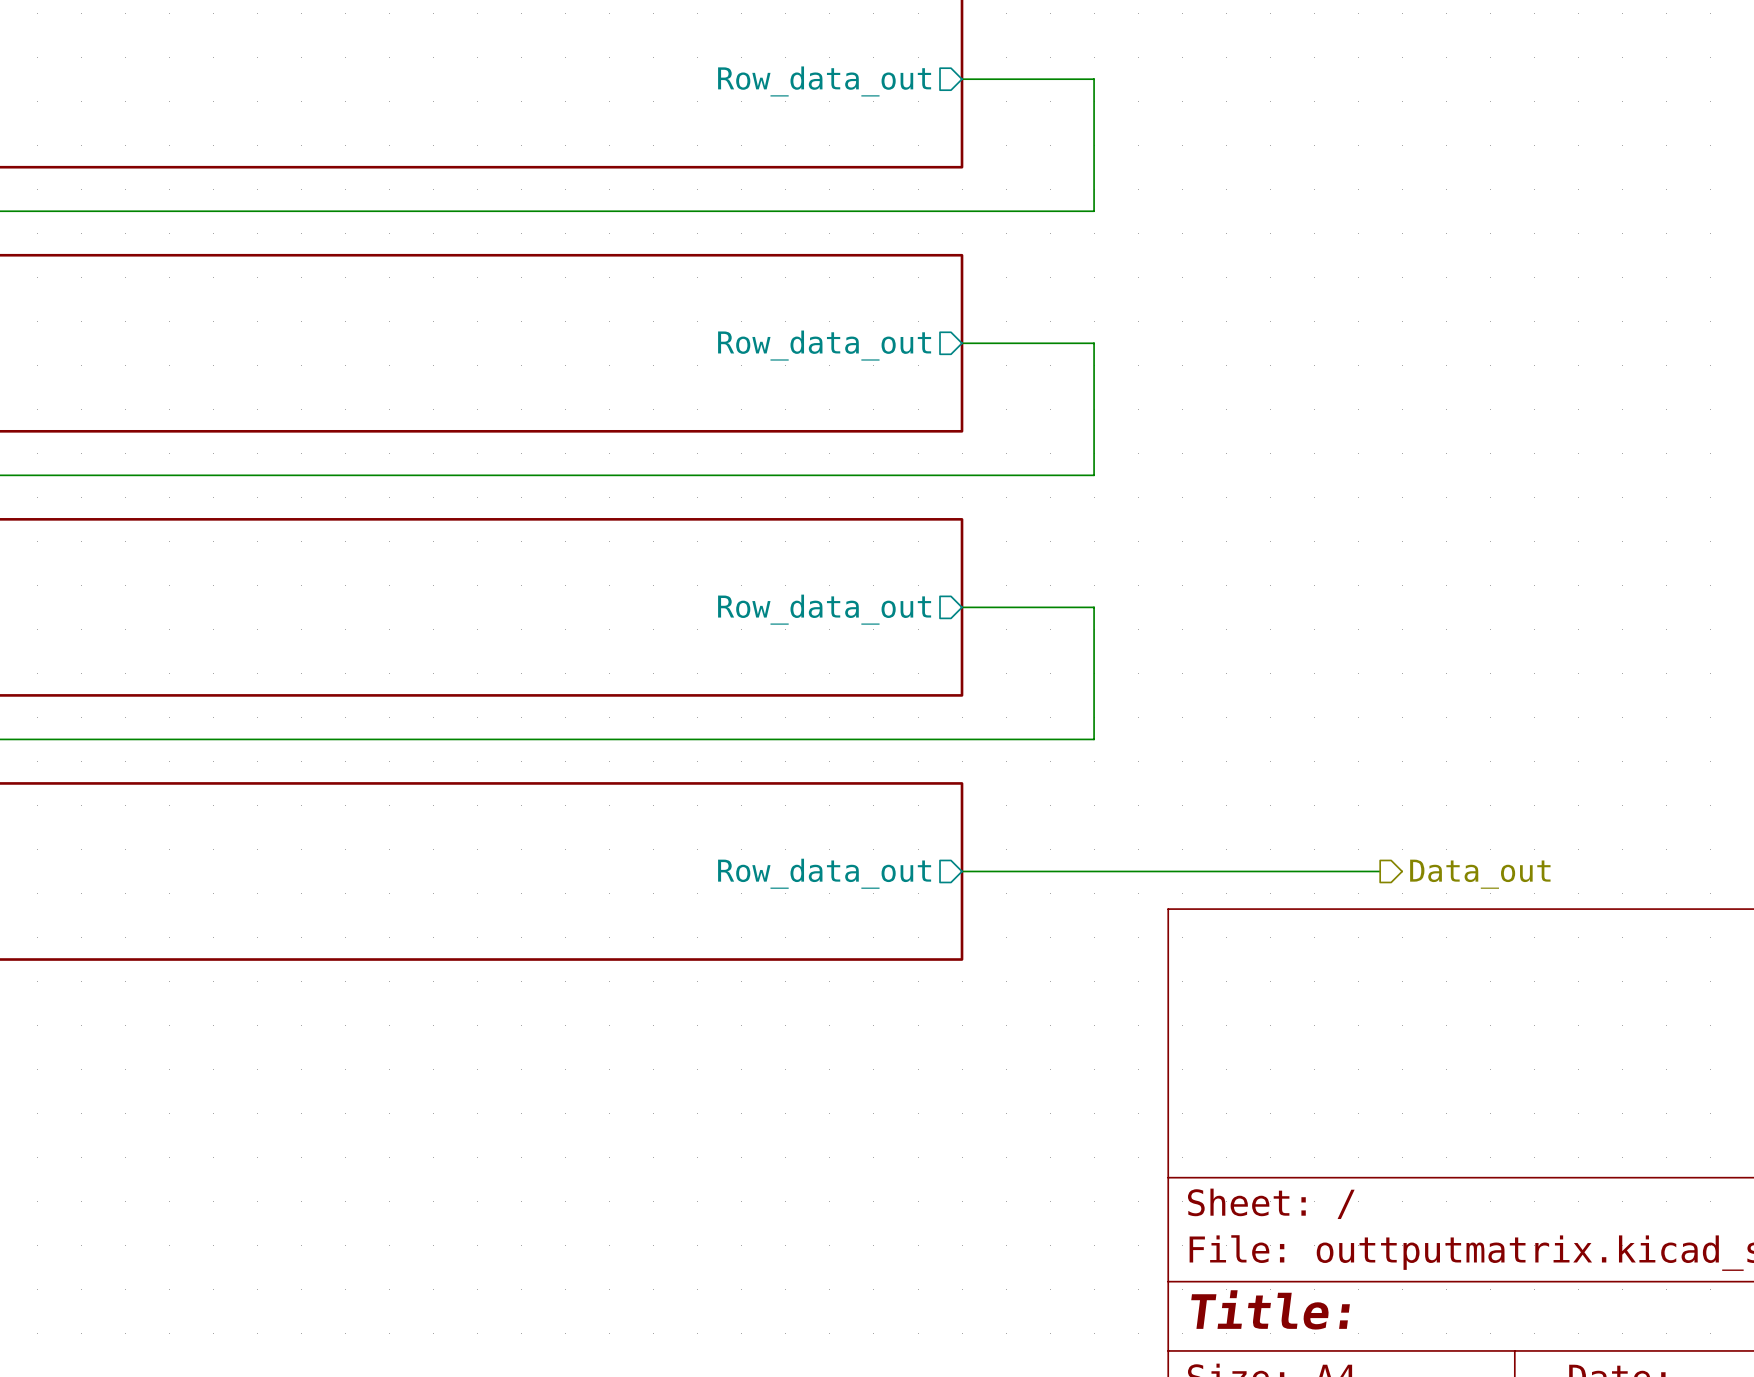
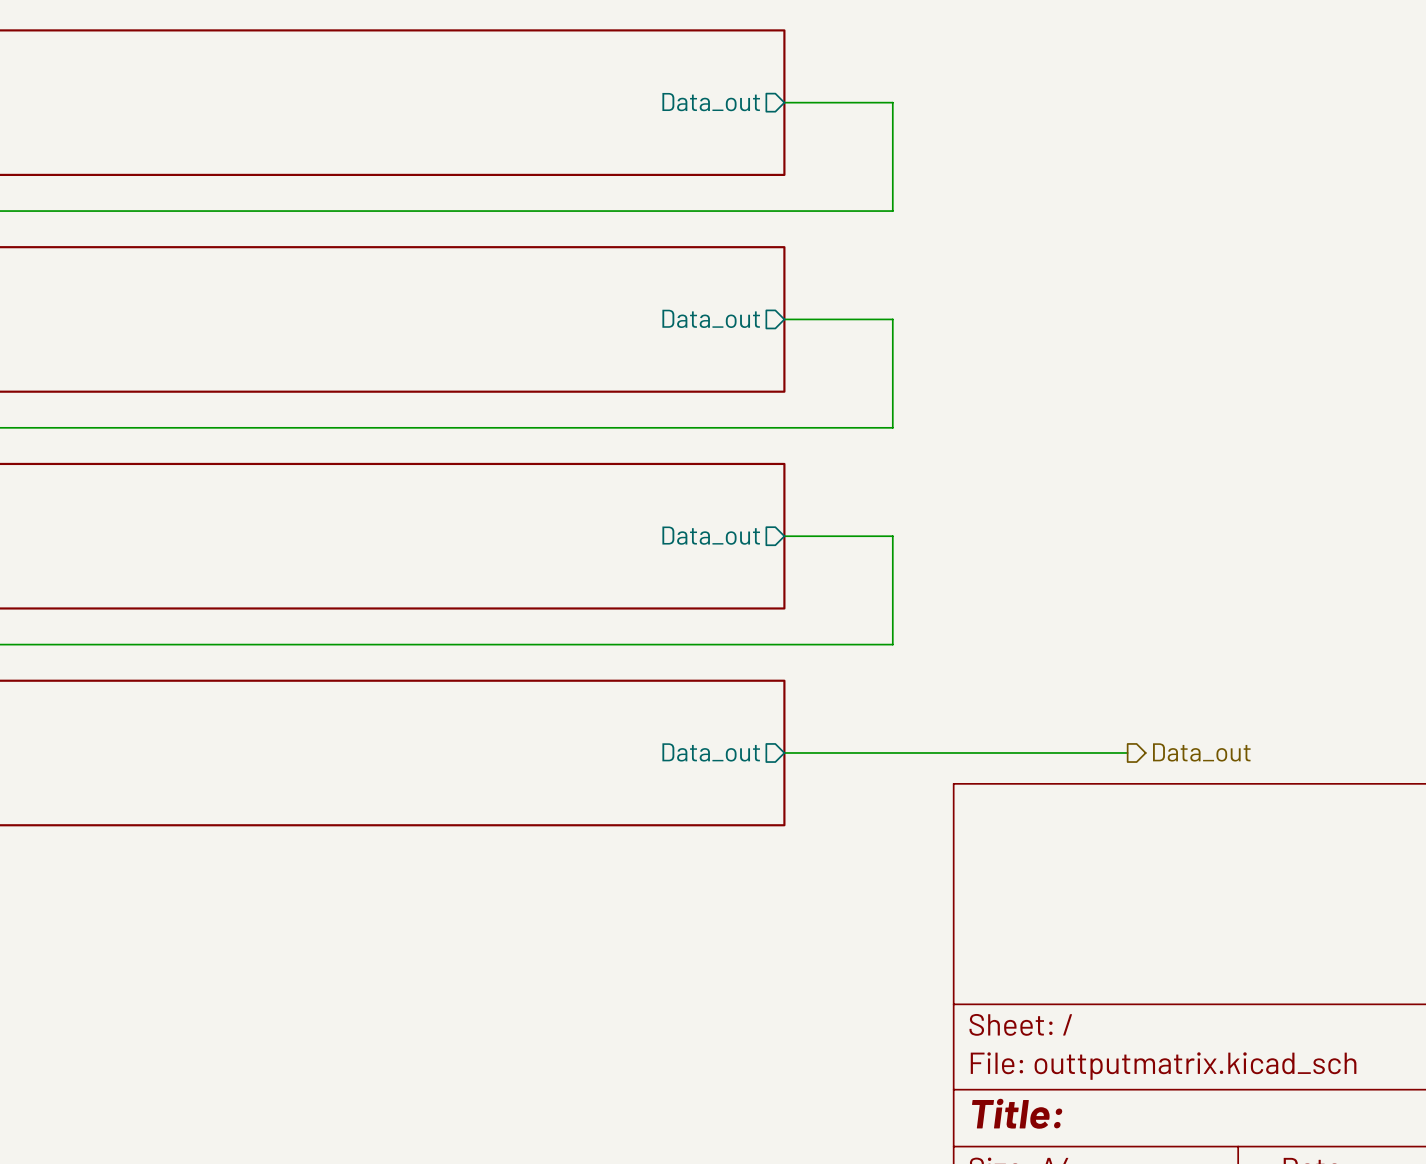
sheet pin: Row_data_out (824, 81) -> Data_out (711, 102)
sheet pin: Row_data_out (824, 345) -> Data_out (711, 318)
sheet pin: Row_data_out (824, 609) -> Data_out (711, 535)
sheet pin: Row_data_out (824, 873) -> Data_out (711, 752)

